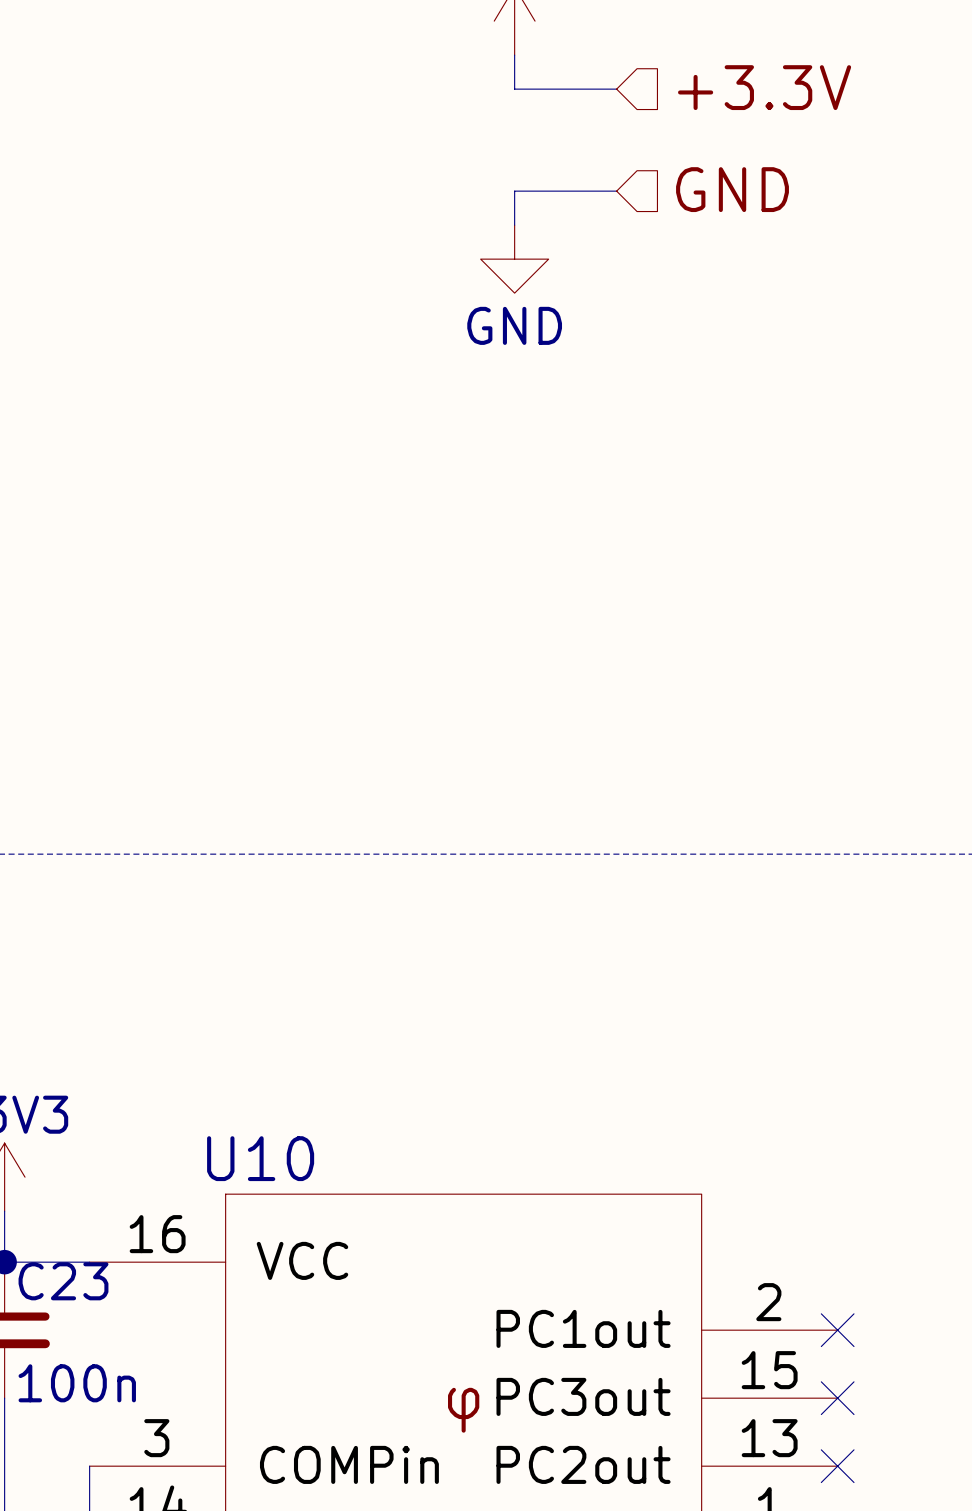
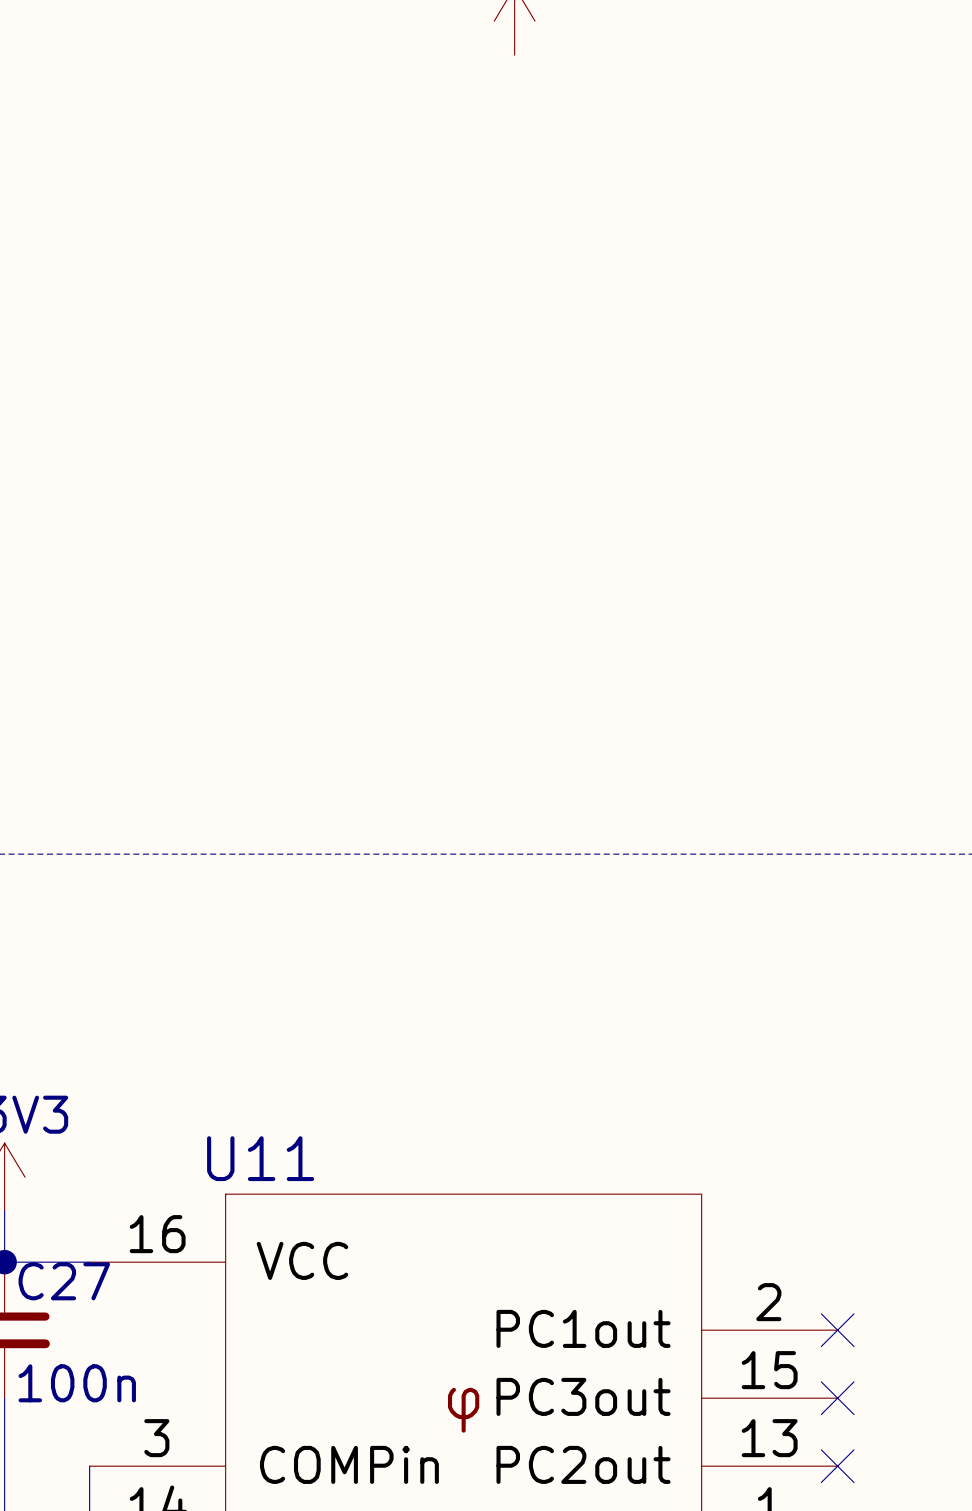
wire: (514, 55) (514, 89) (616, 89) -> none
hierarchical label: +3.3V (764, 87) -> none
hierarchical label: GND (732, 189) -> none
wire: (616, 191) (514, 191) (514, 225) -> none
power symbol: GND (514, 259) -> none
U10 name: U10 (260, 1158) -> U11 (260, 1158)
C23 name: C23 (63, 1281) -> C27 (64, 1281)

